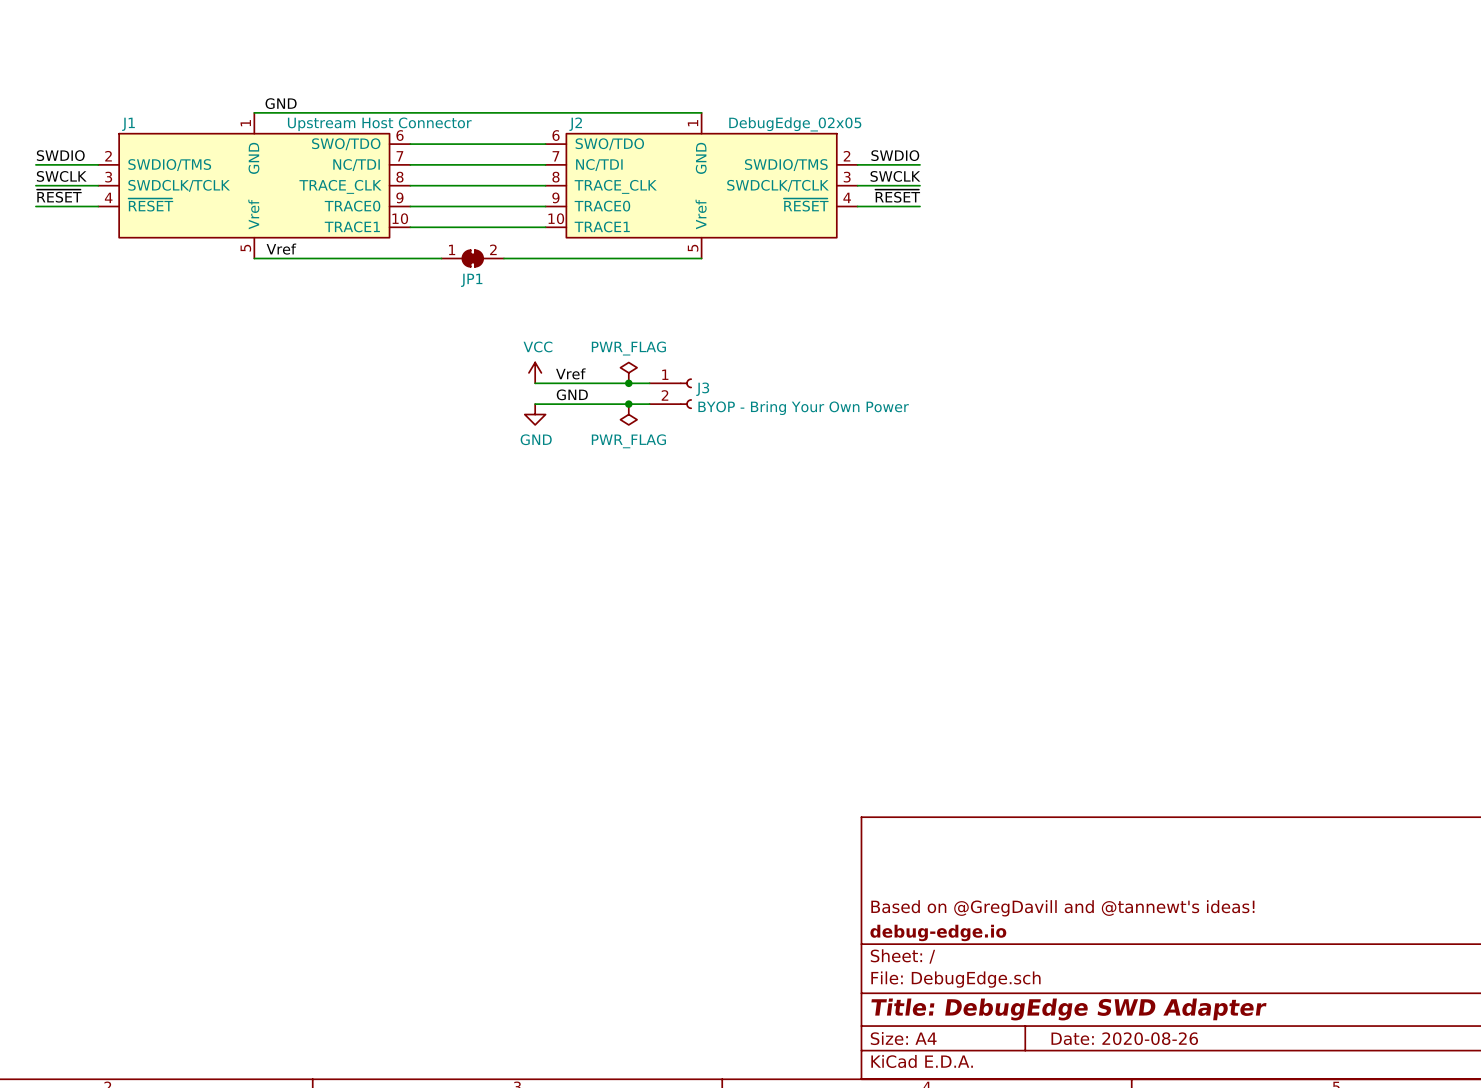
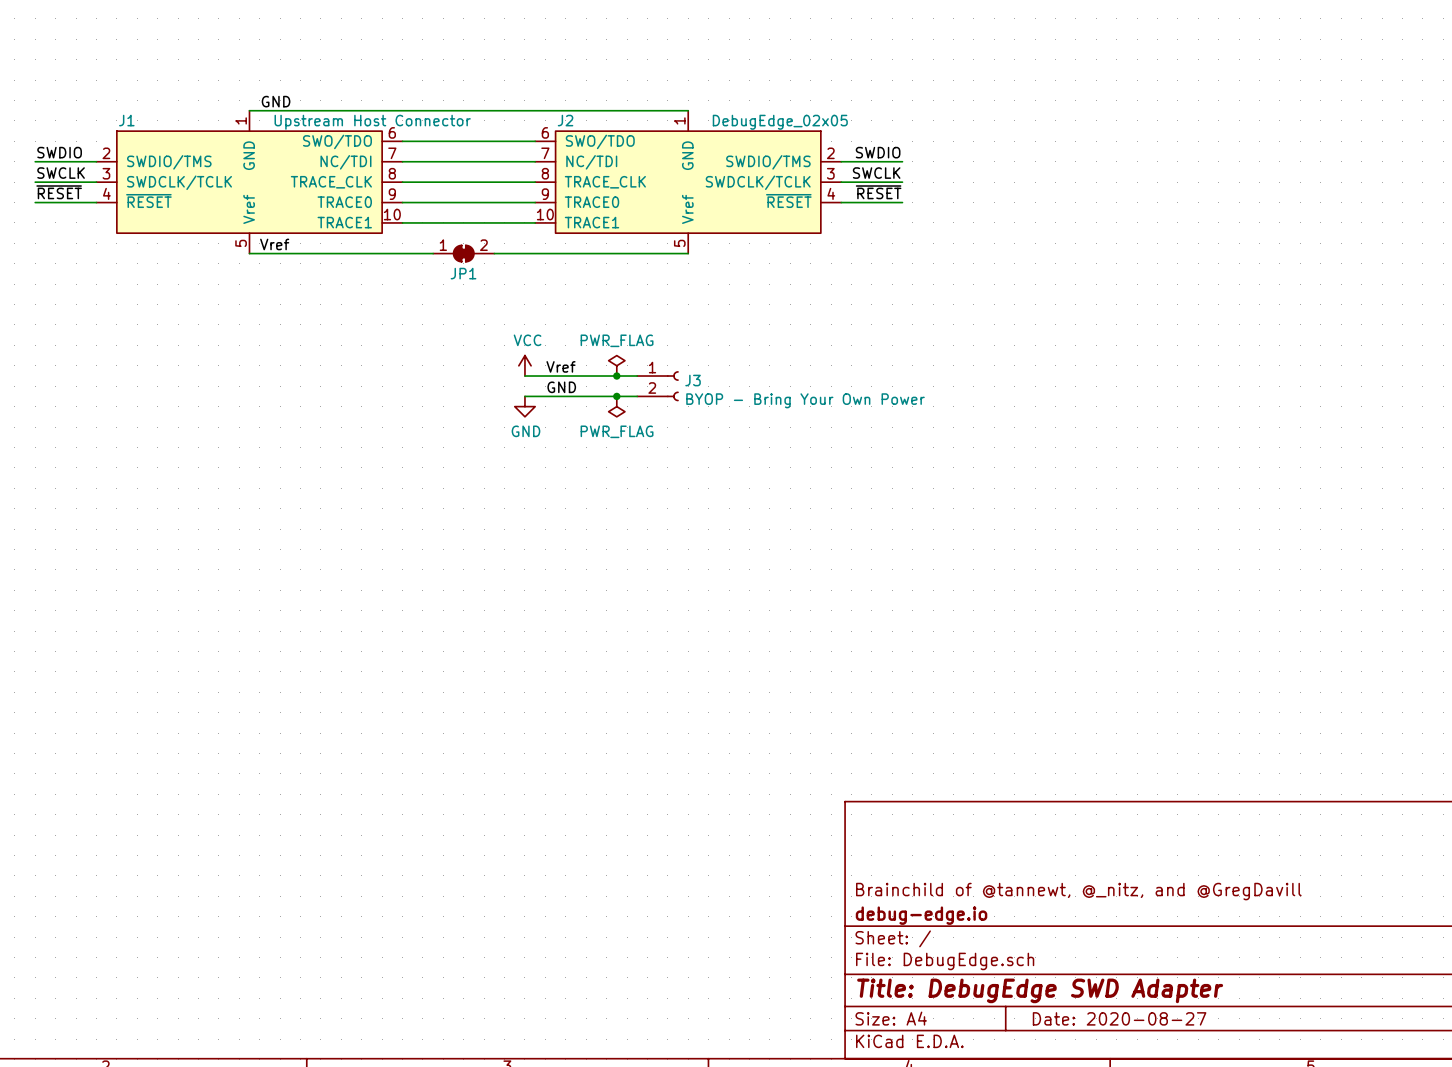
title block: Based on @GregDavill and @tannewt's ideas! (1062, 908) -> Brainchild of @tannewt, @_nitz, and @GregDavill (1078, 891)
title block: Date: 2020-08-26 (1124, 1038) -> Date: 2020-08-27 (1119, 1018)

